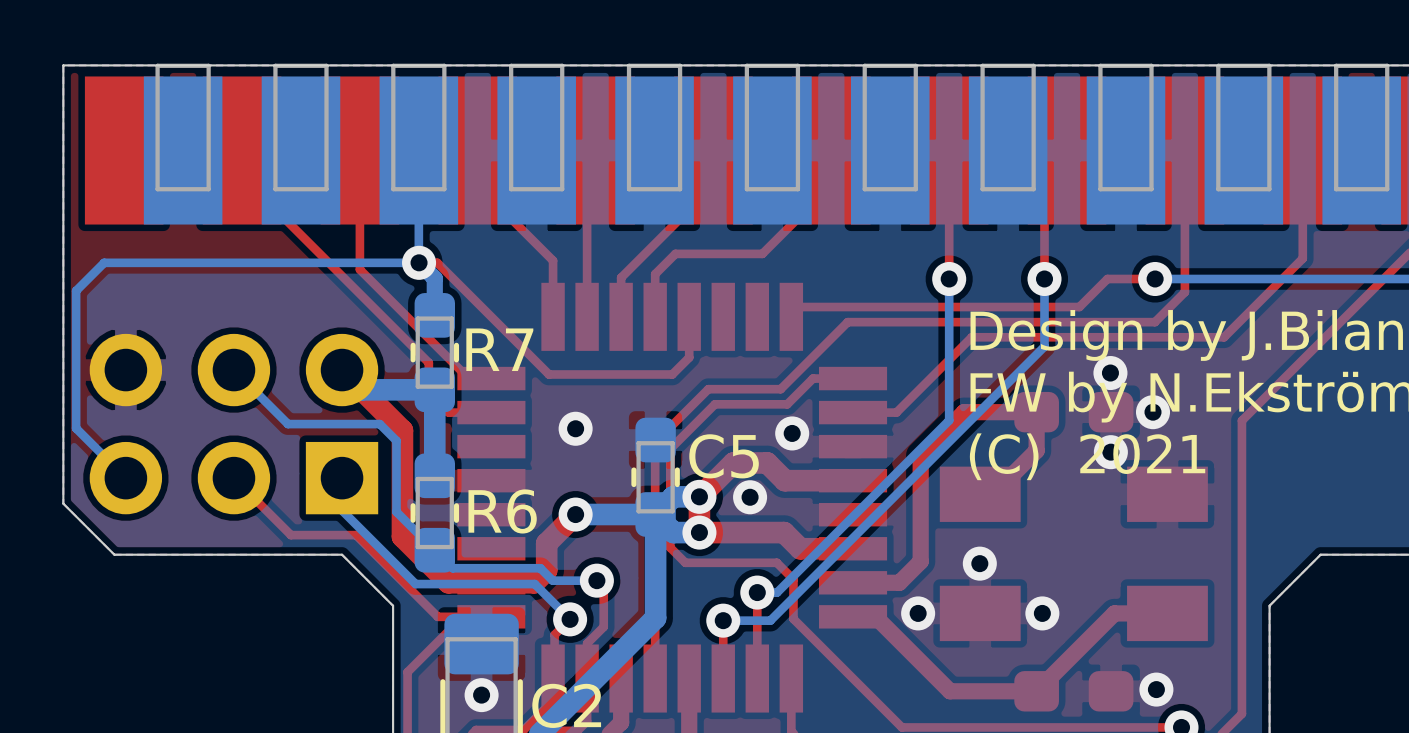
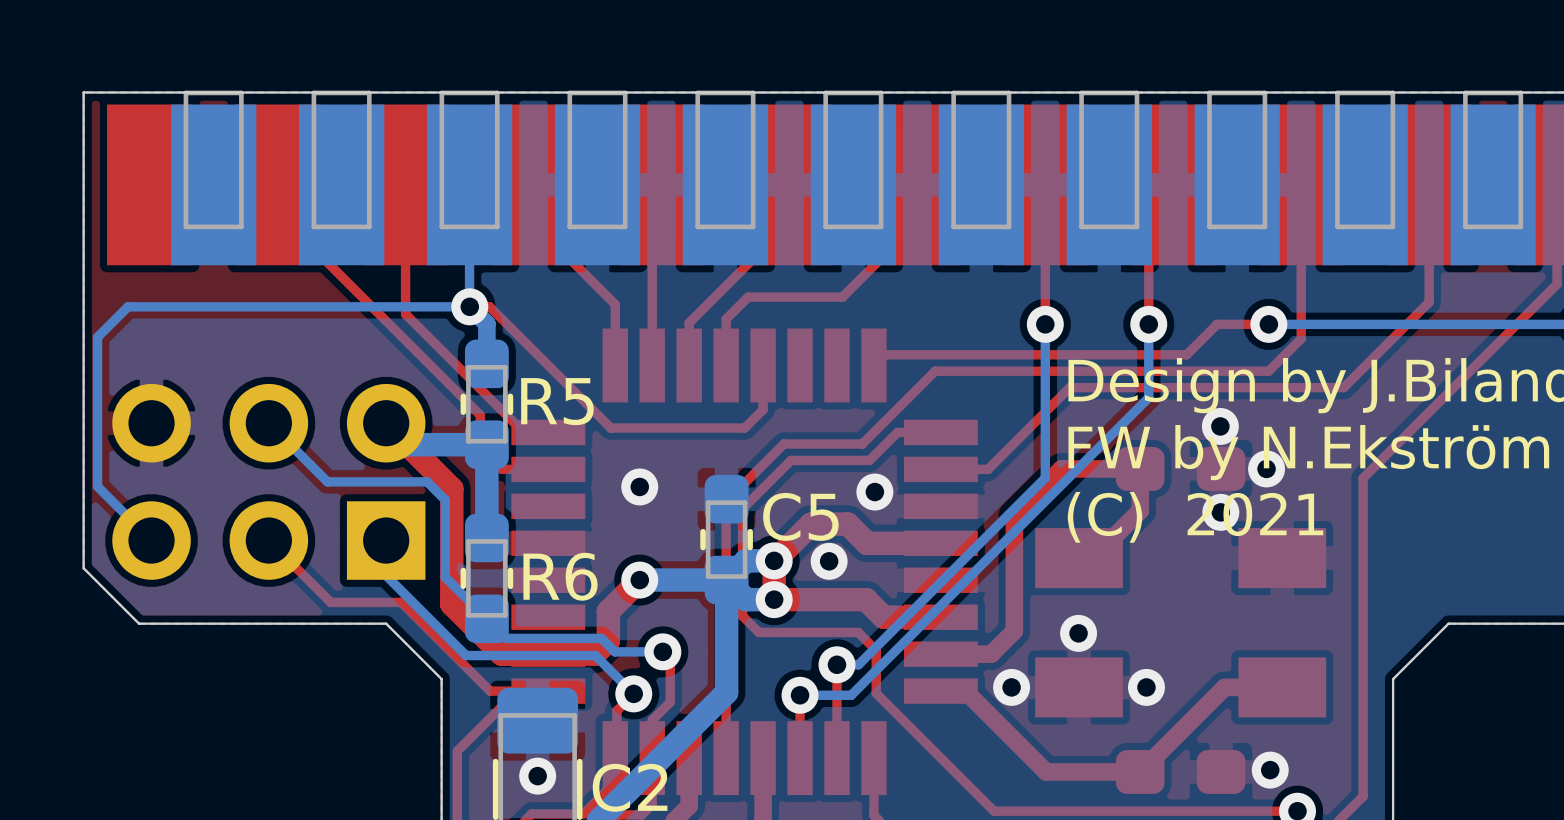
R7 name: R7 (499, 349) -> R5 (557, 401)

